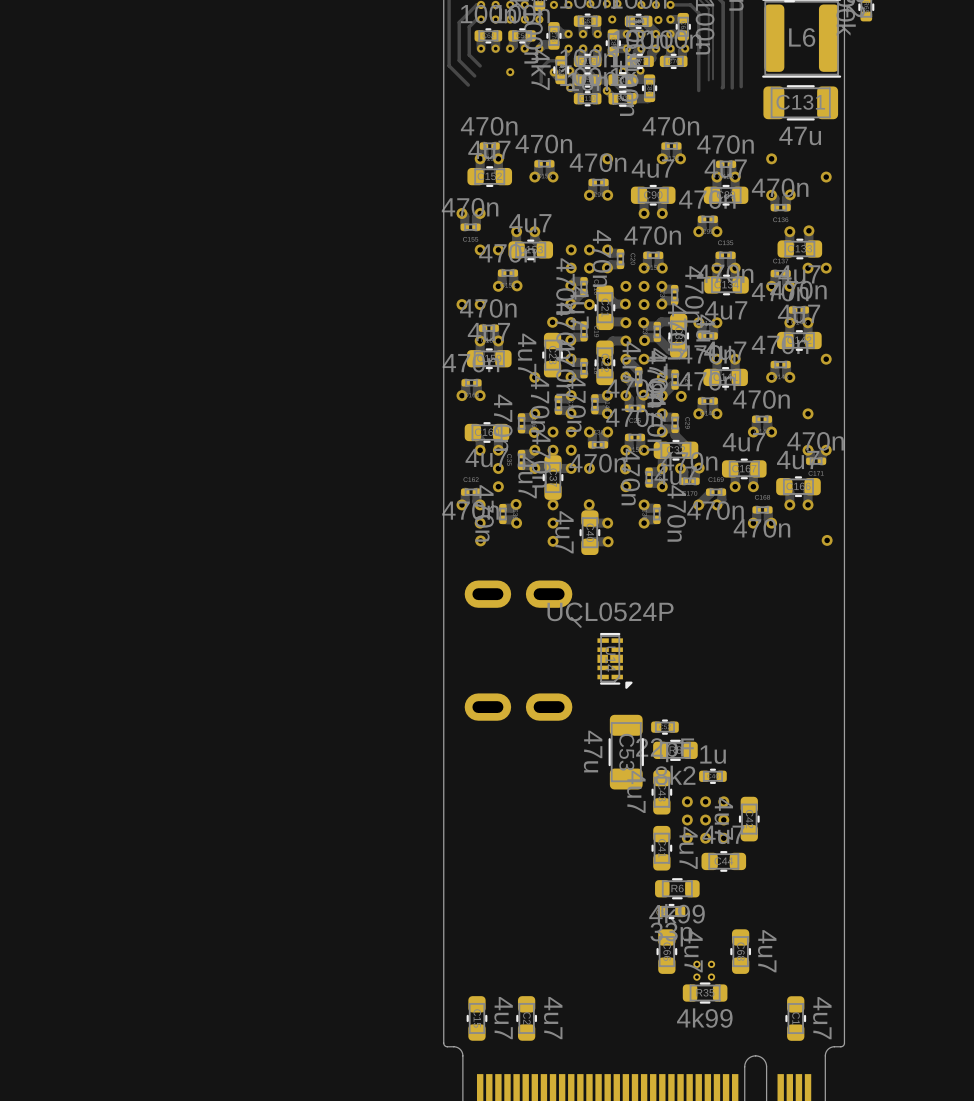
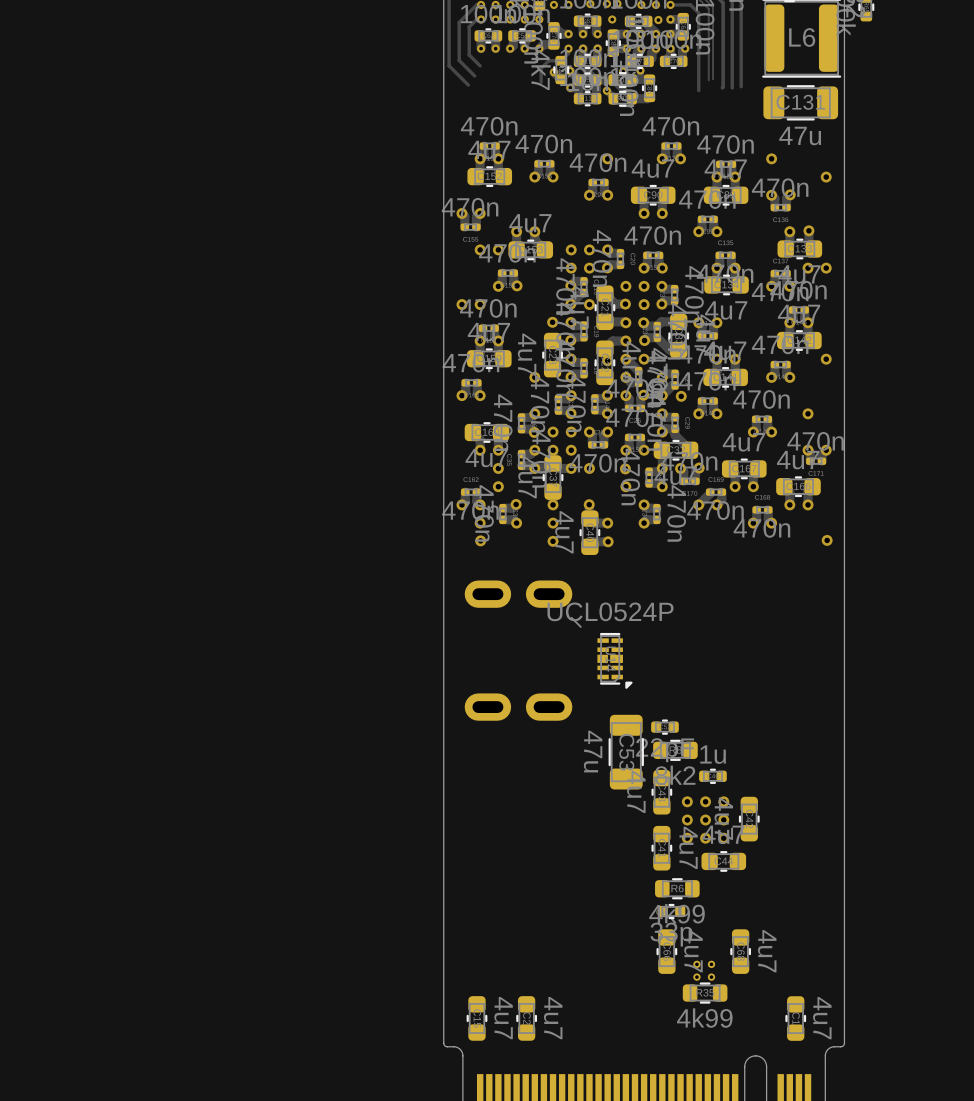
via: (510, 72) -> none

